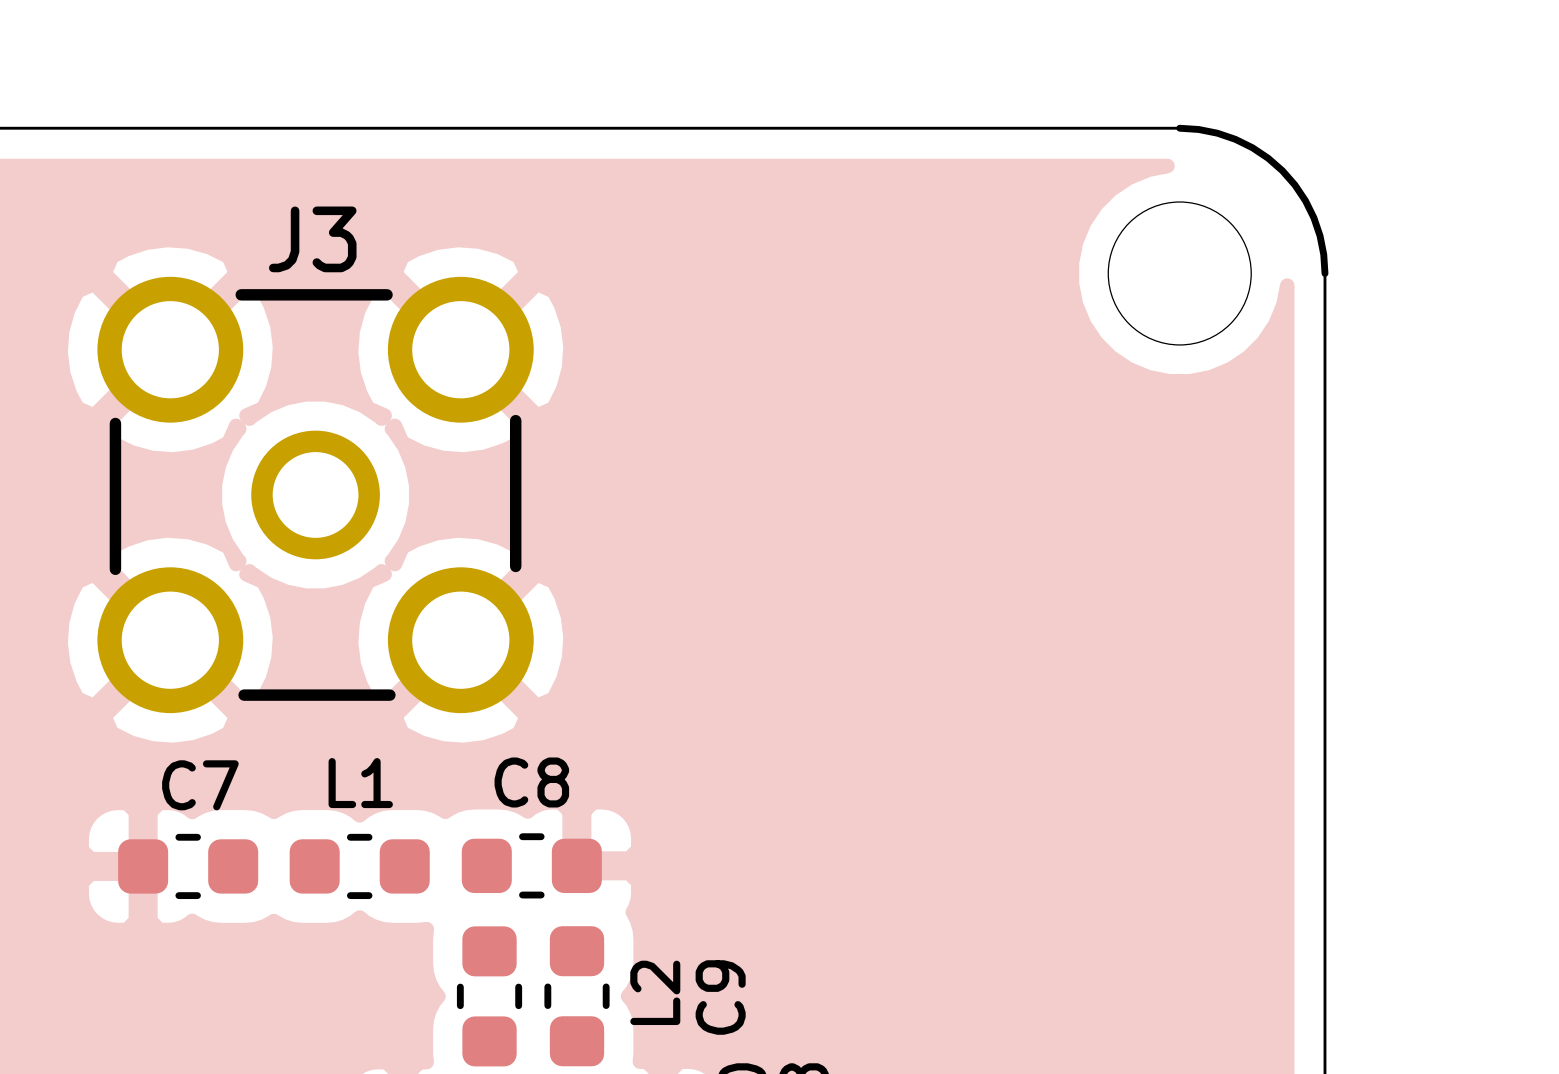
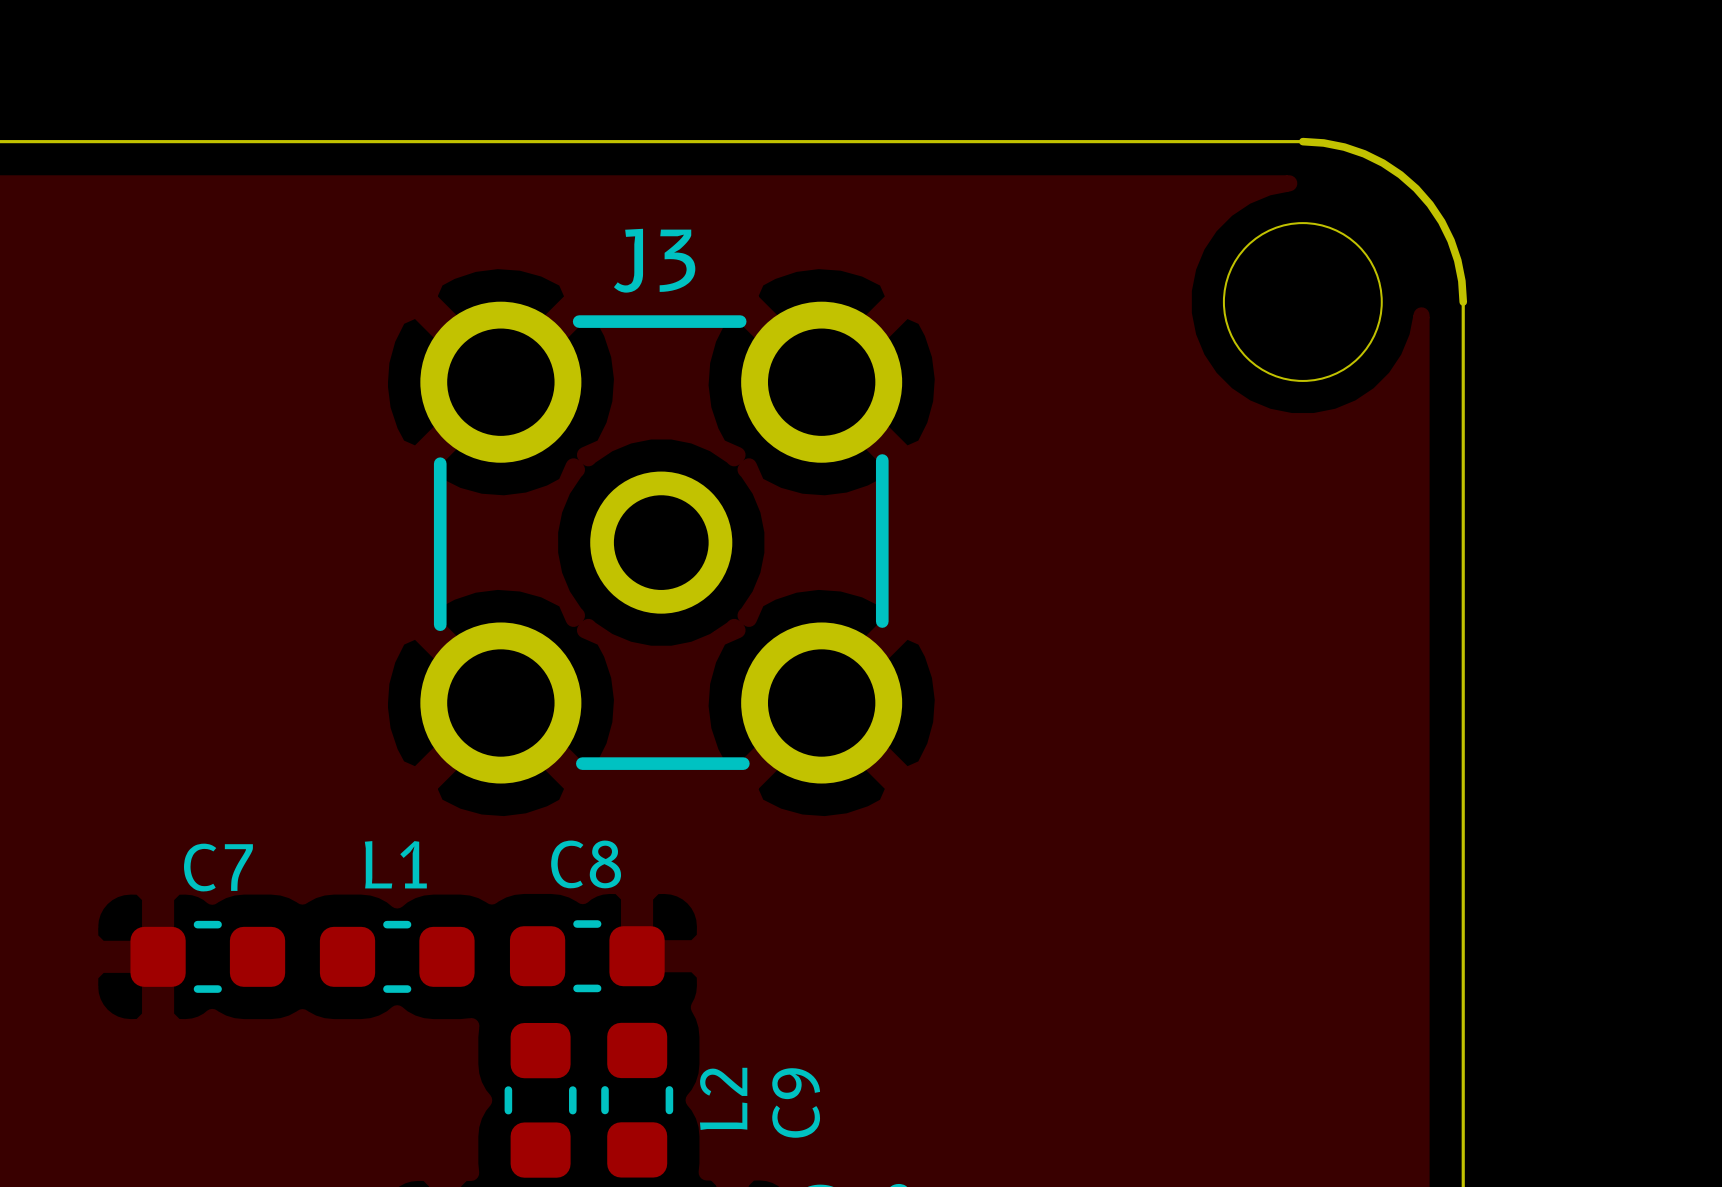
J3 position: (315, 494) -> (661, 542)

